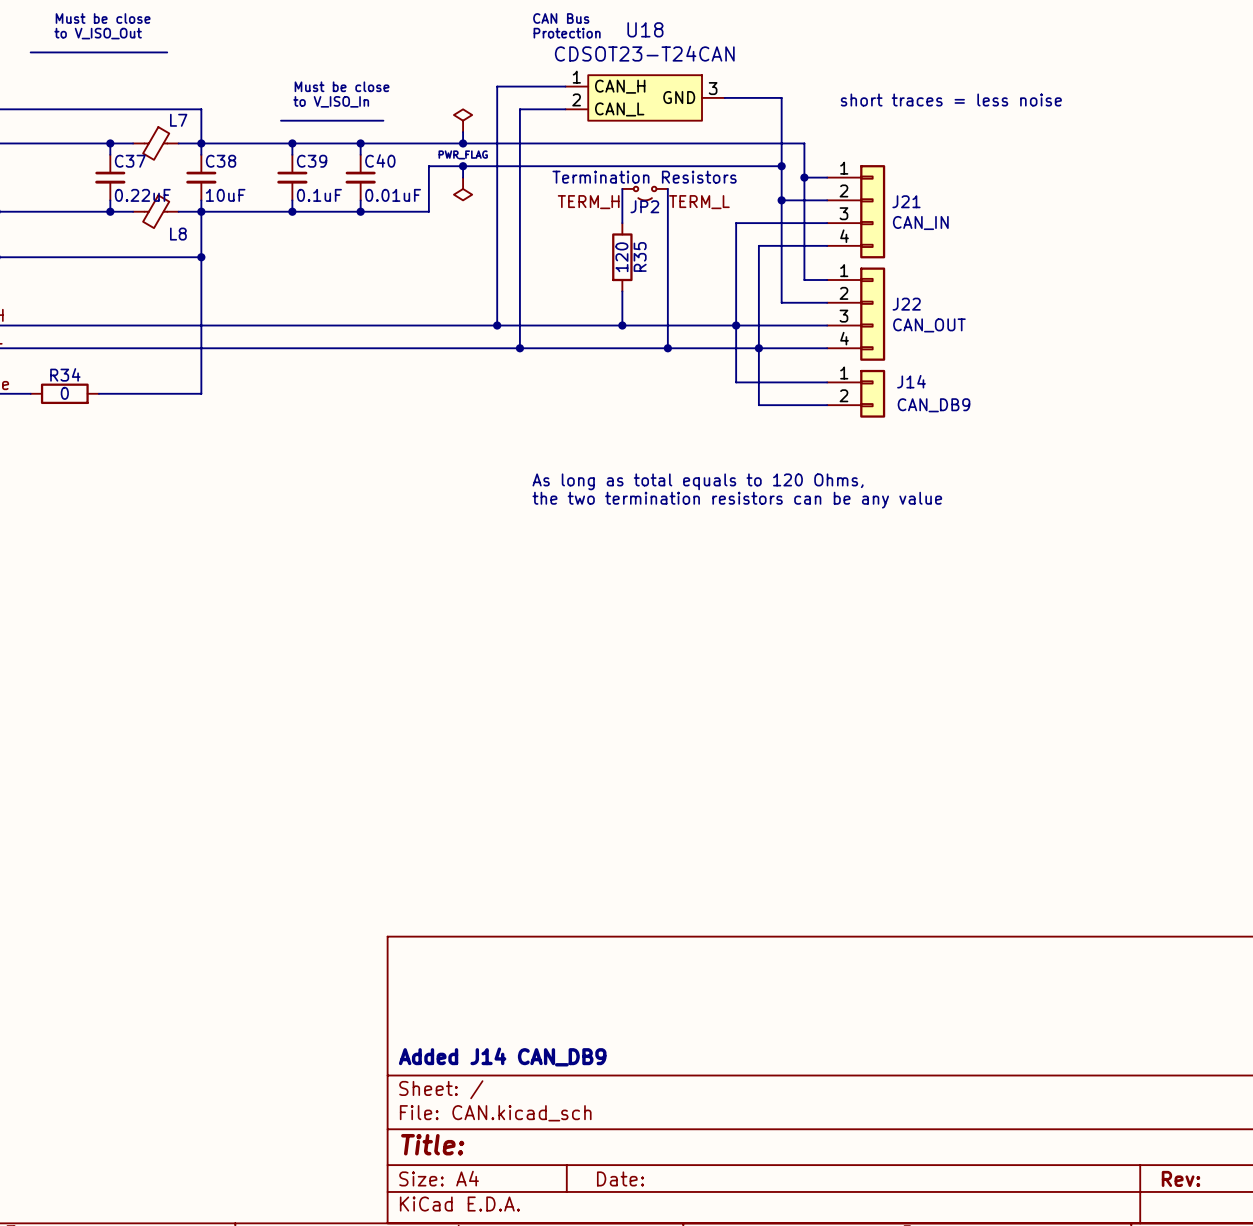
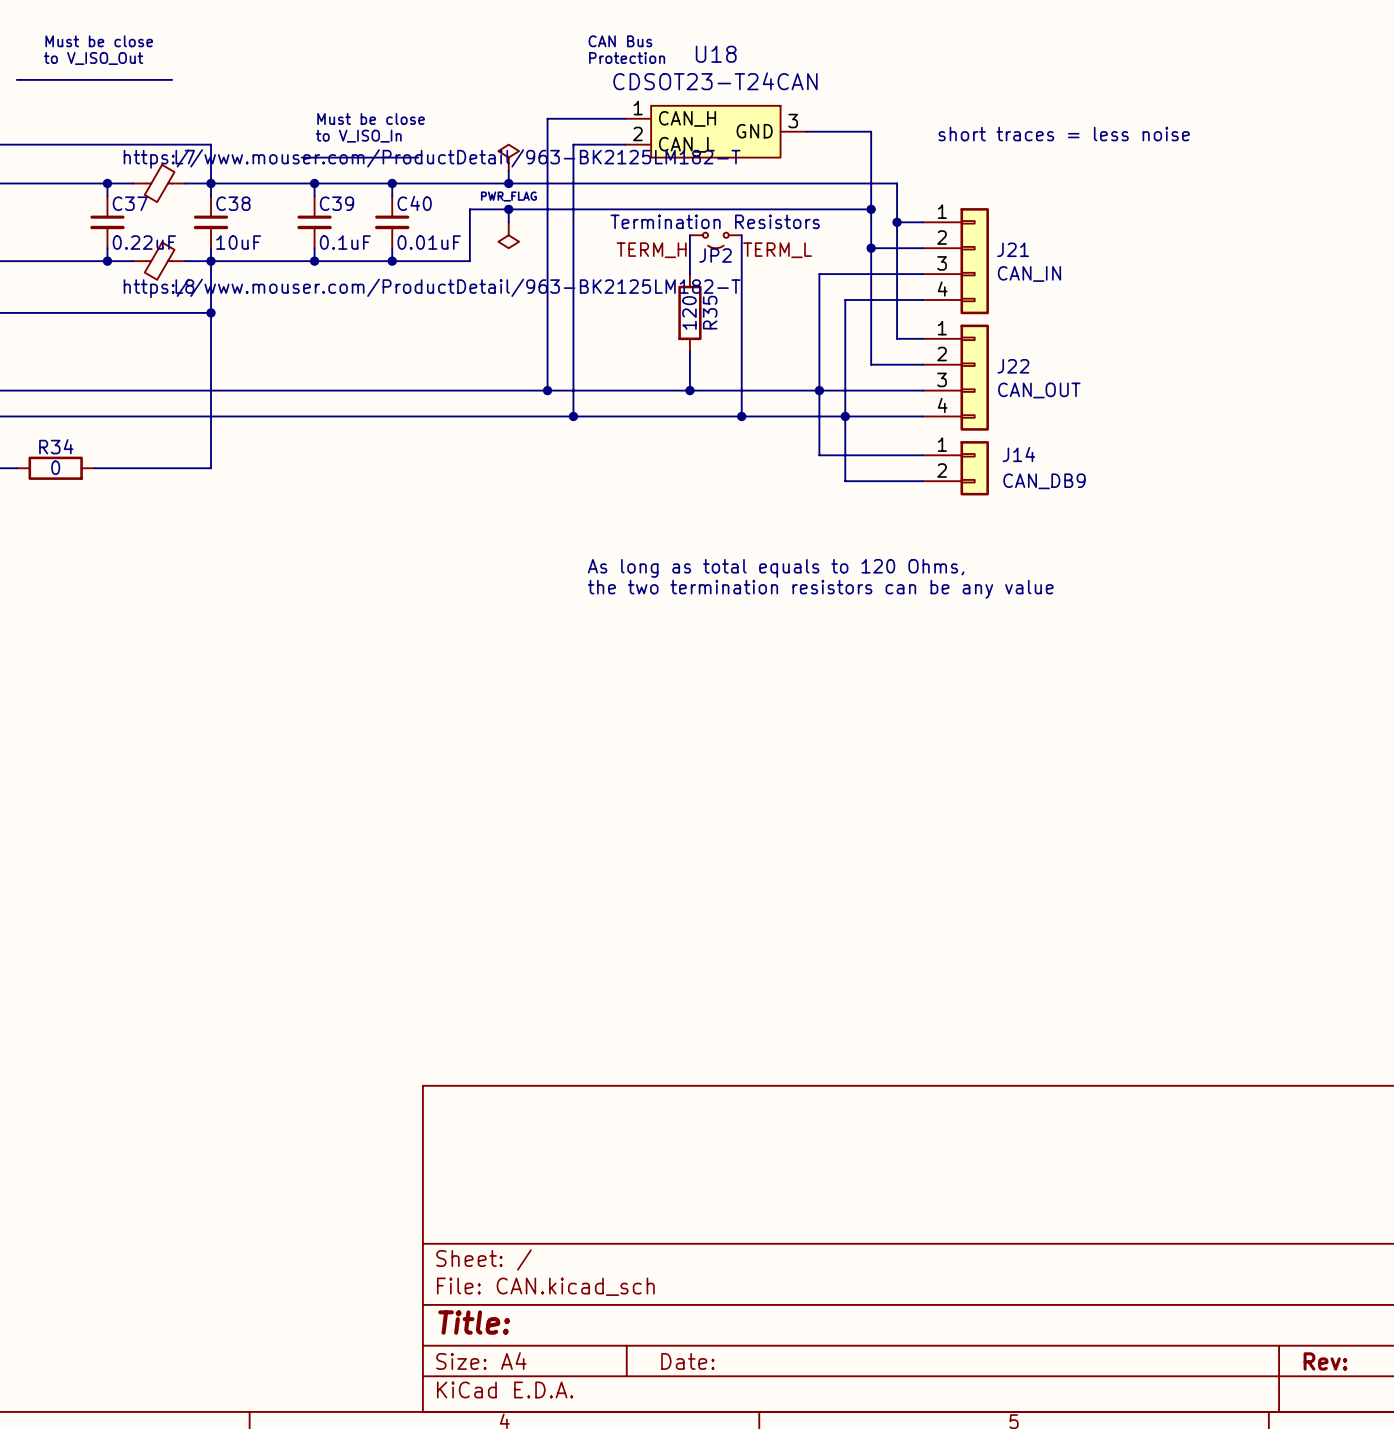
L7 value: none -> https://www.mouser.com/ProductDetail/963-BK2125LM182-T (432, 158)
L8 value: none -> https://www.mouser.com/ProductDetail/963-BK2125LM182-T (432, 288)
text: Added J14 CAN_DB9 (502, 1056) -> none

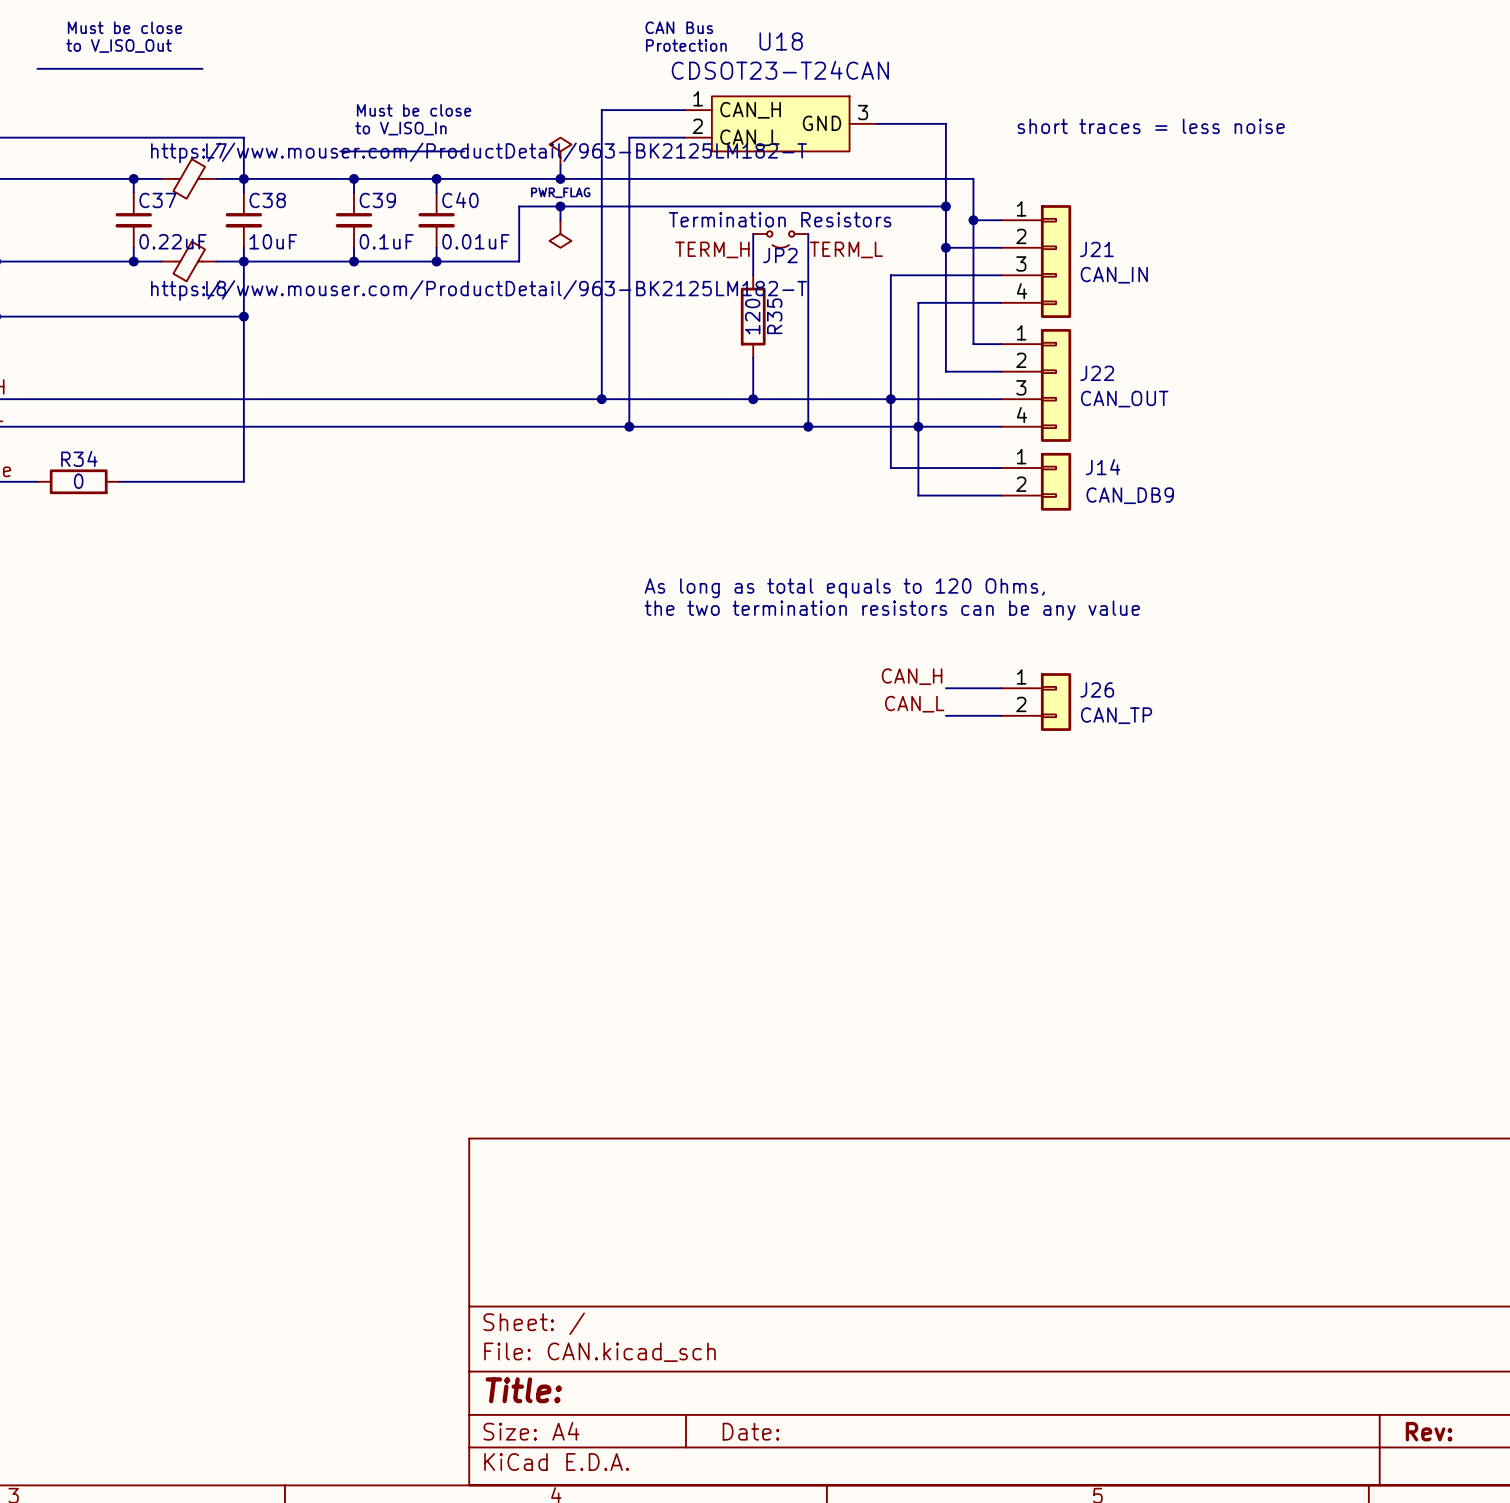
label: none -> CAN_H (912, 676)
wire: none -> (945, 688) (1000, 688)
J26: none -> CAN_TP (1036, 702)
label: none -> CAN_L (914, 704)
wire: none -> (945, 715) (1000, 715)

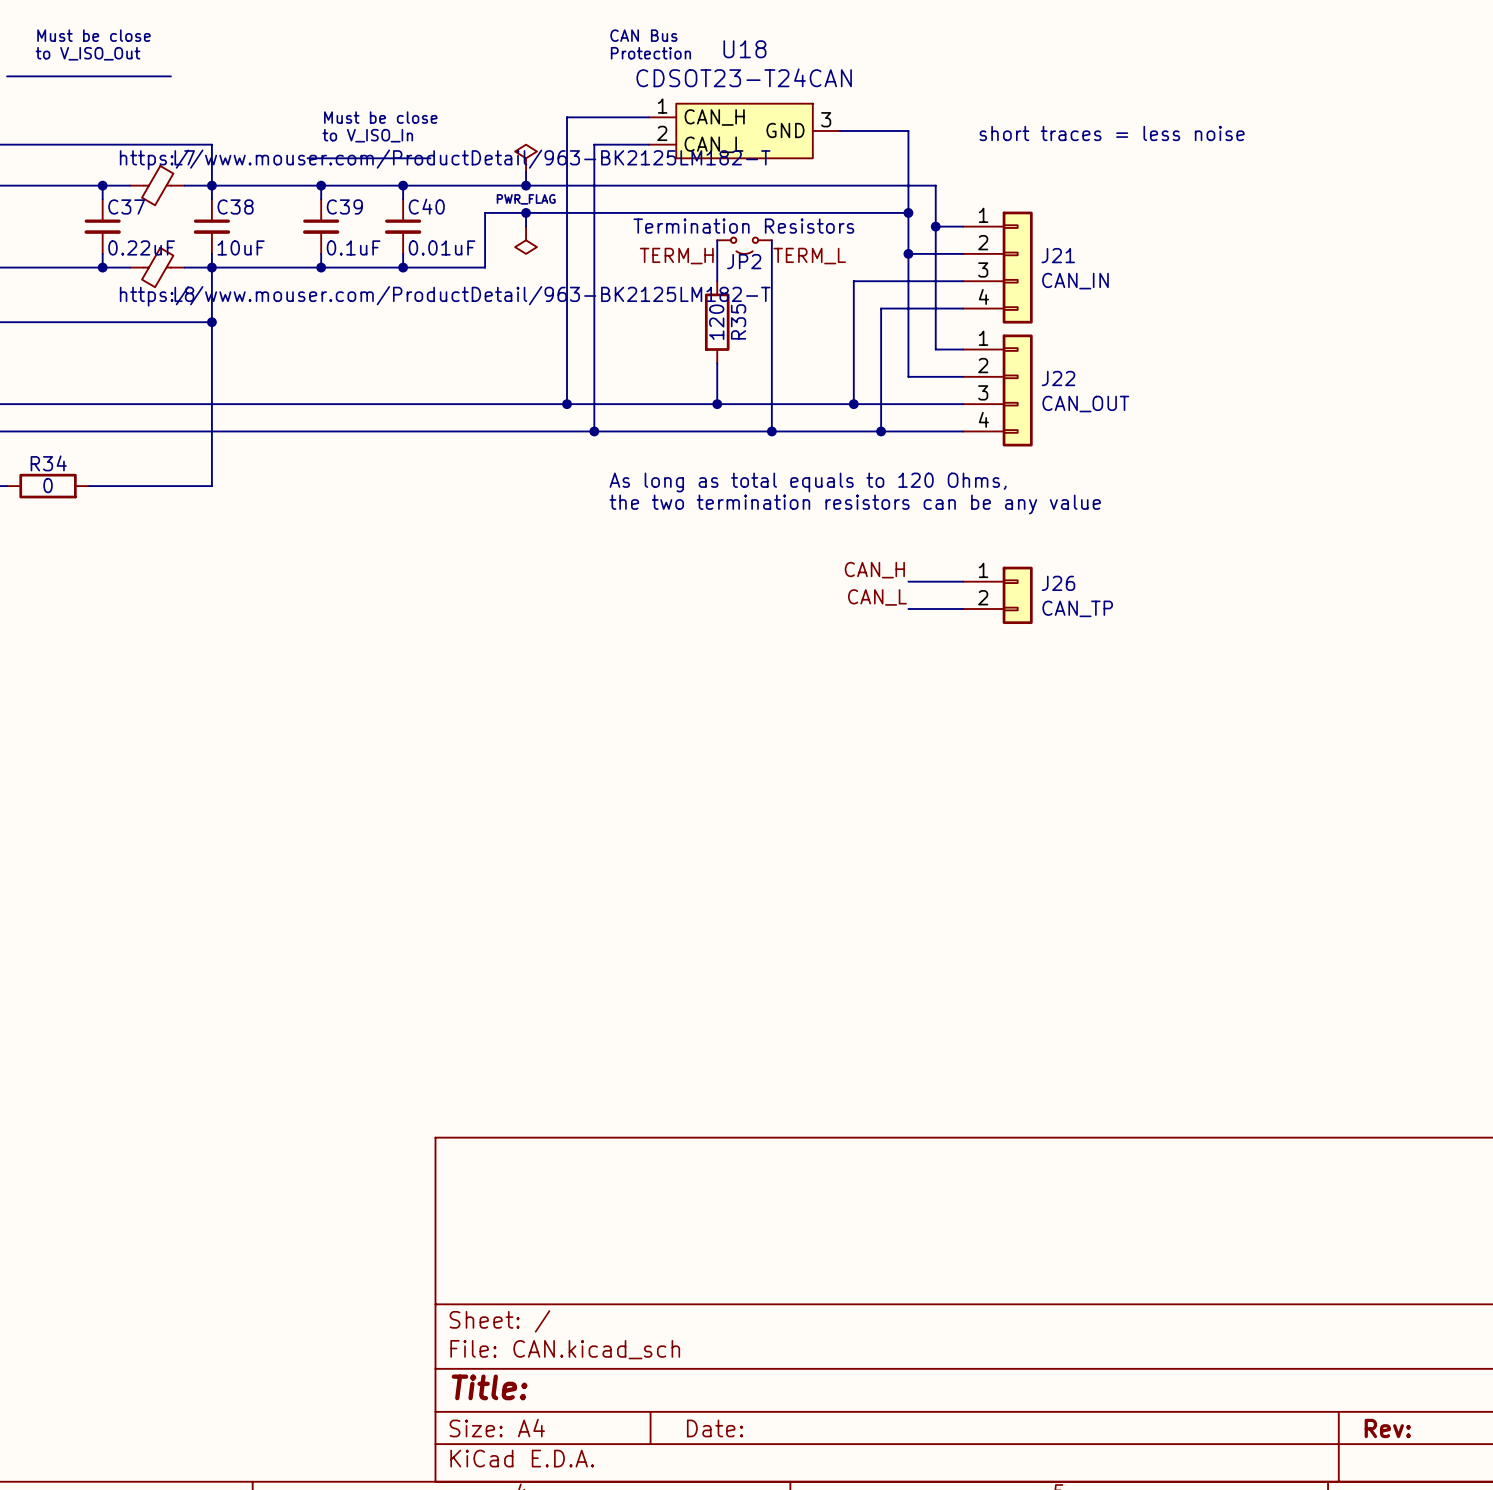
wire: (890, 399) (890, 468) (1000, 468) -> none
wire: (918, 426) (918, 495) (1000, 495) -> none
J14: CAN_DB9 (1036, 481) -> none
text position: As long as total equals to 120 Ohms, (844, 588) -> As long as total equals to 120 Ohms, (808, 482)
text position: the two termination resistors can be any value (892, 610) -> the two termination resistors can be any value (855, 504)
label position: CAN_H (912, 676) -> CAN_H (874, 570)
wire: (945, 688) (1000, 688) -> (908, 609) (963, 609)
J26 position: (1036, 702) -> (997, 595)
label position: CAN_L (914, 704) -> CAN_L (877, 597)
wire: (945, 715) (1000, 715) -> (908, 581) (963, 581)

